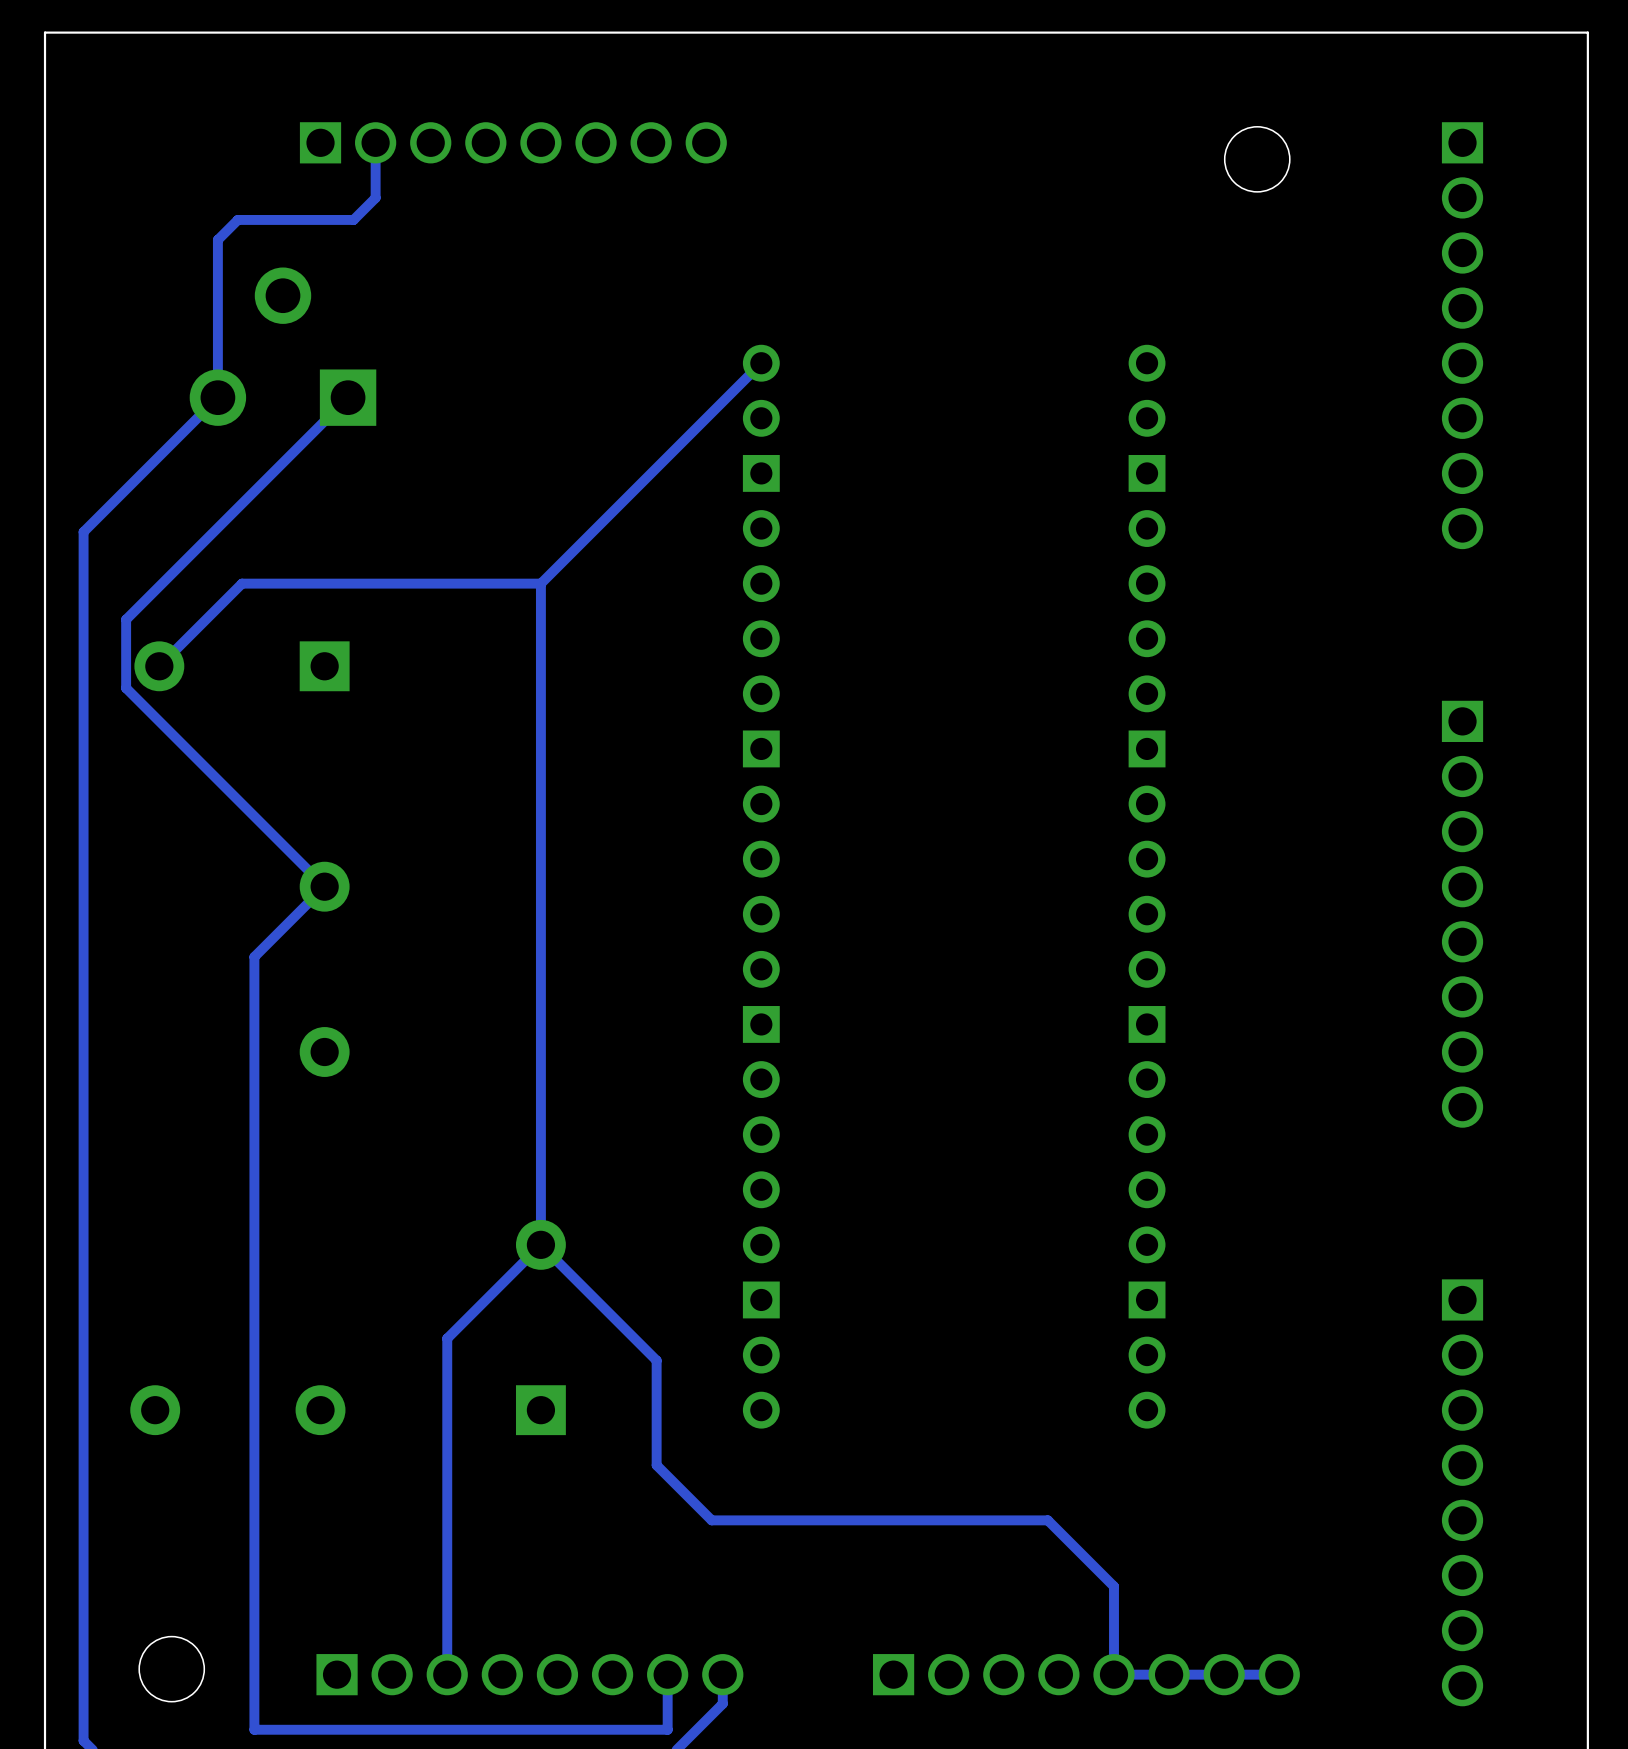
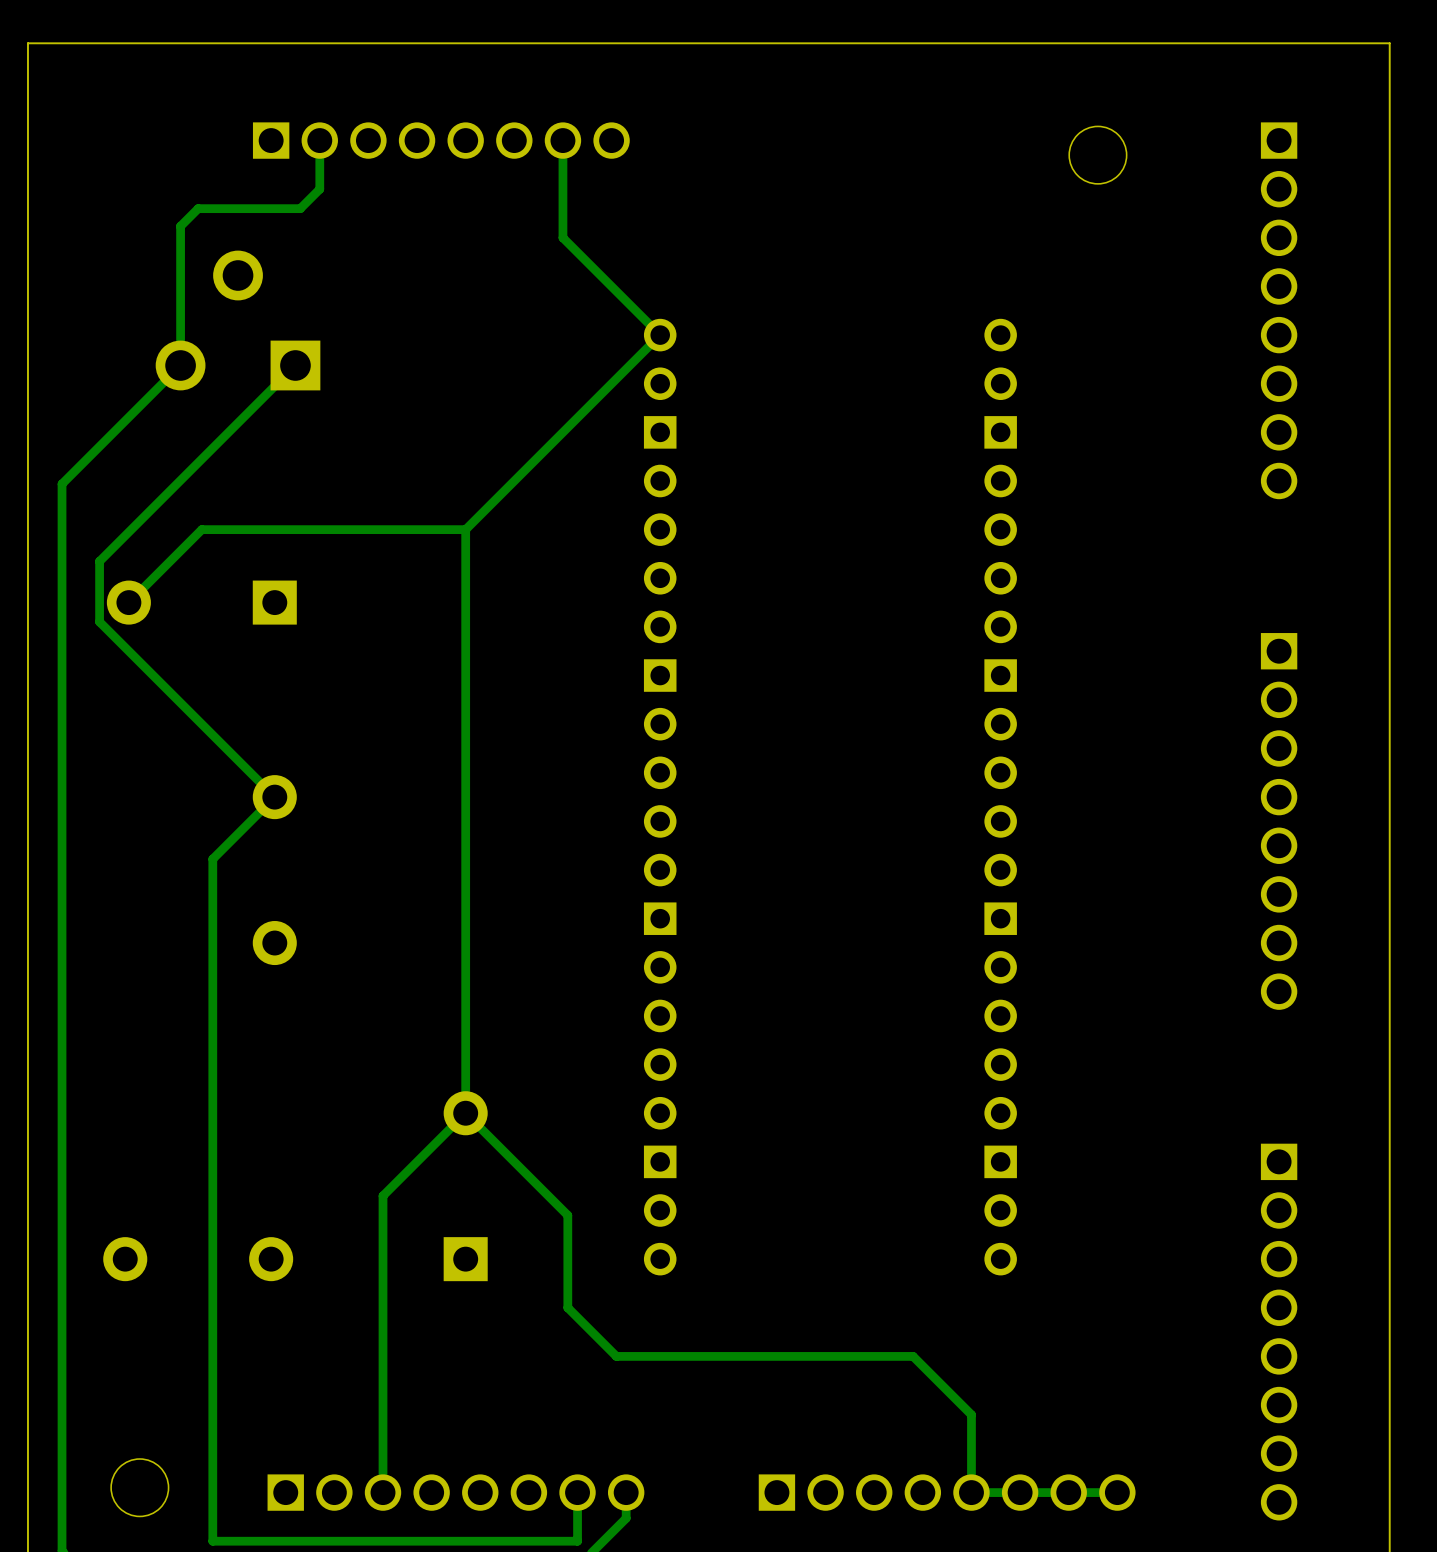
track: none -> (562, 140) (562, 237) (660, 335)

